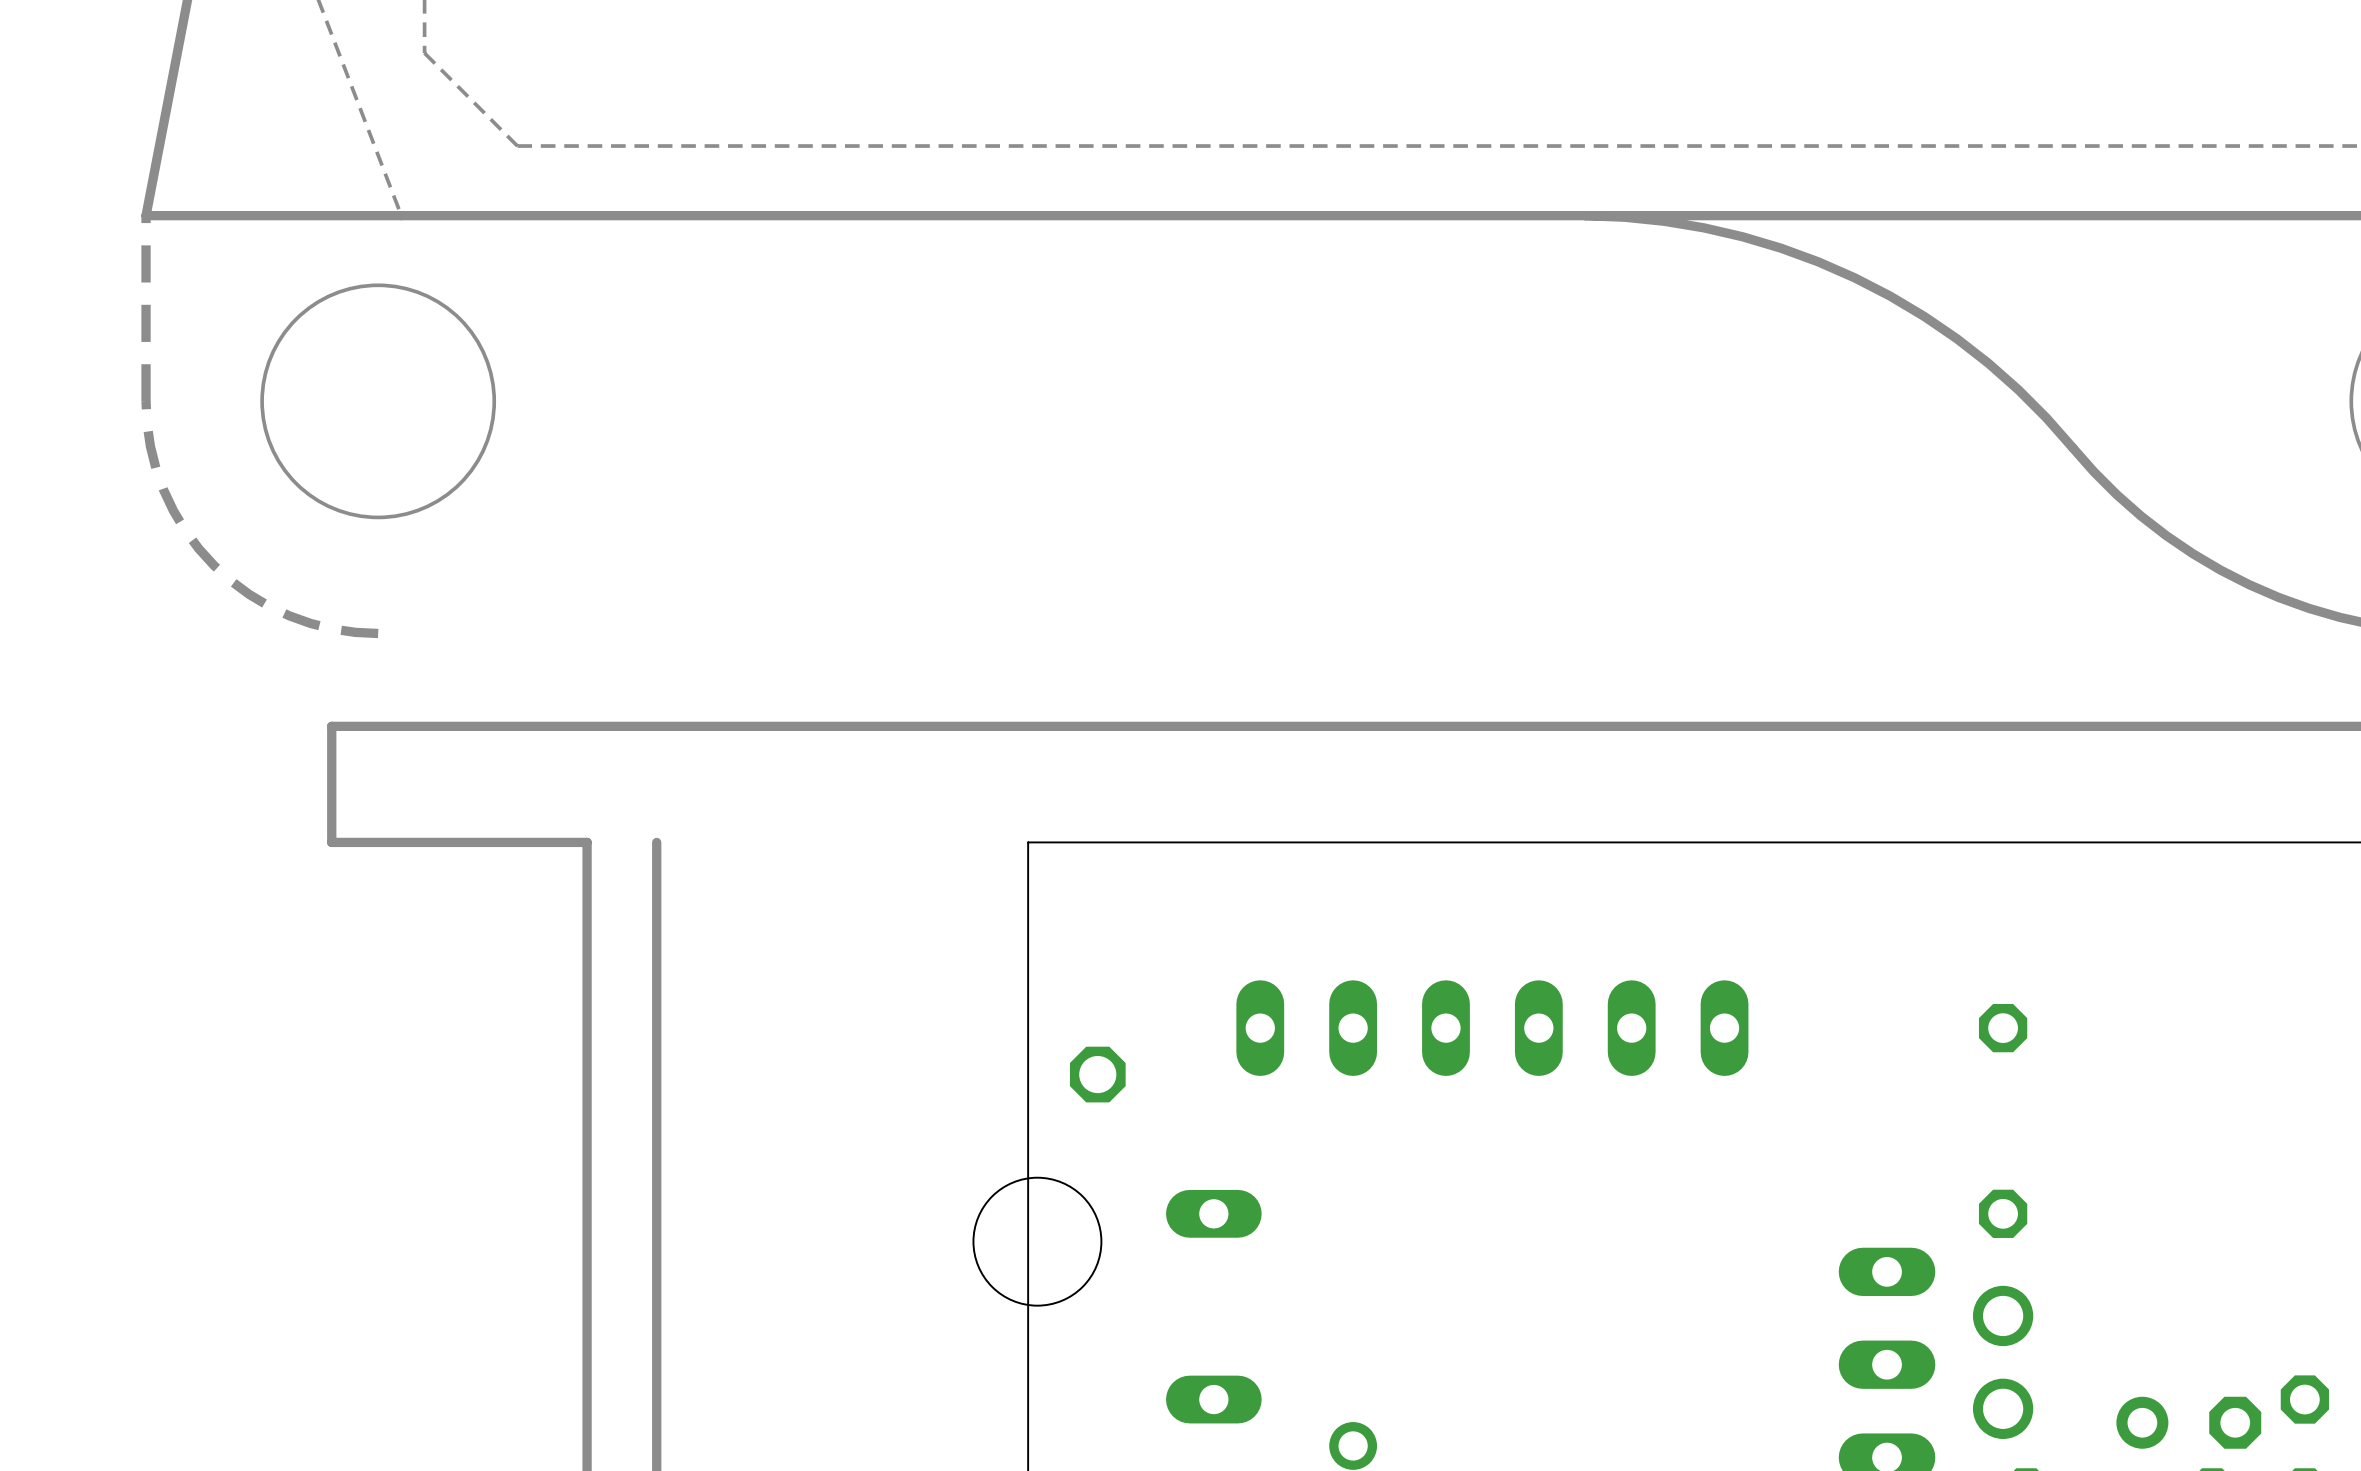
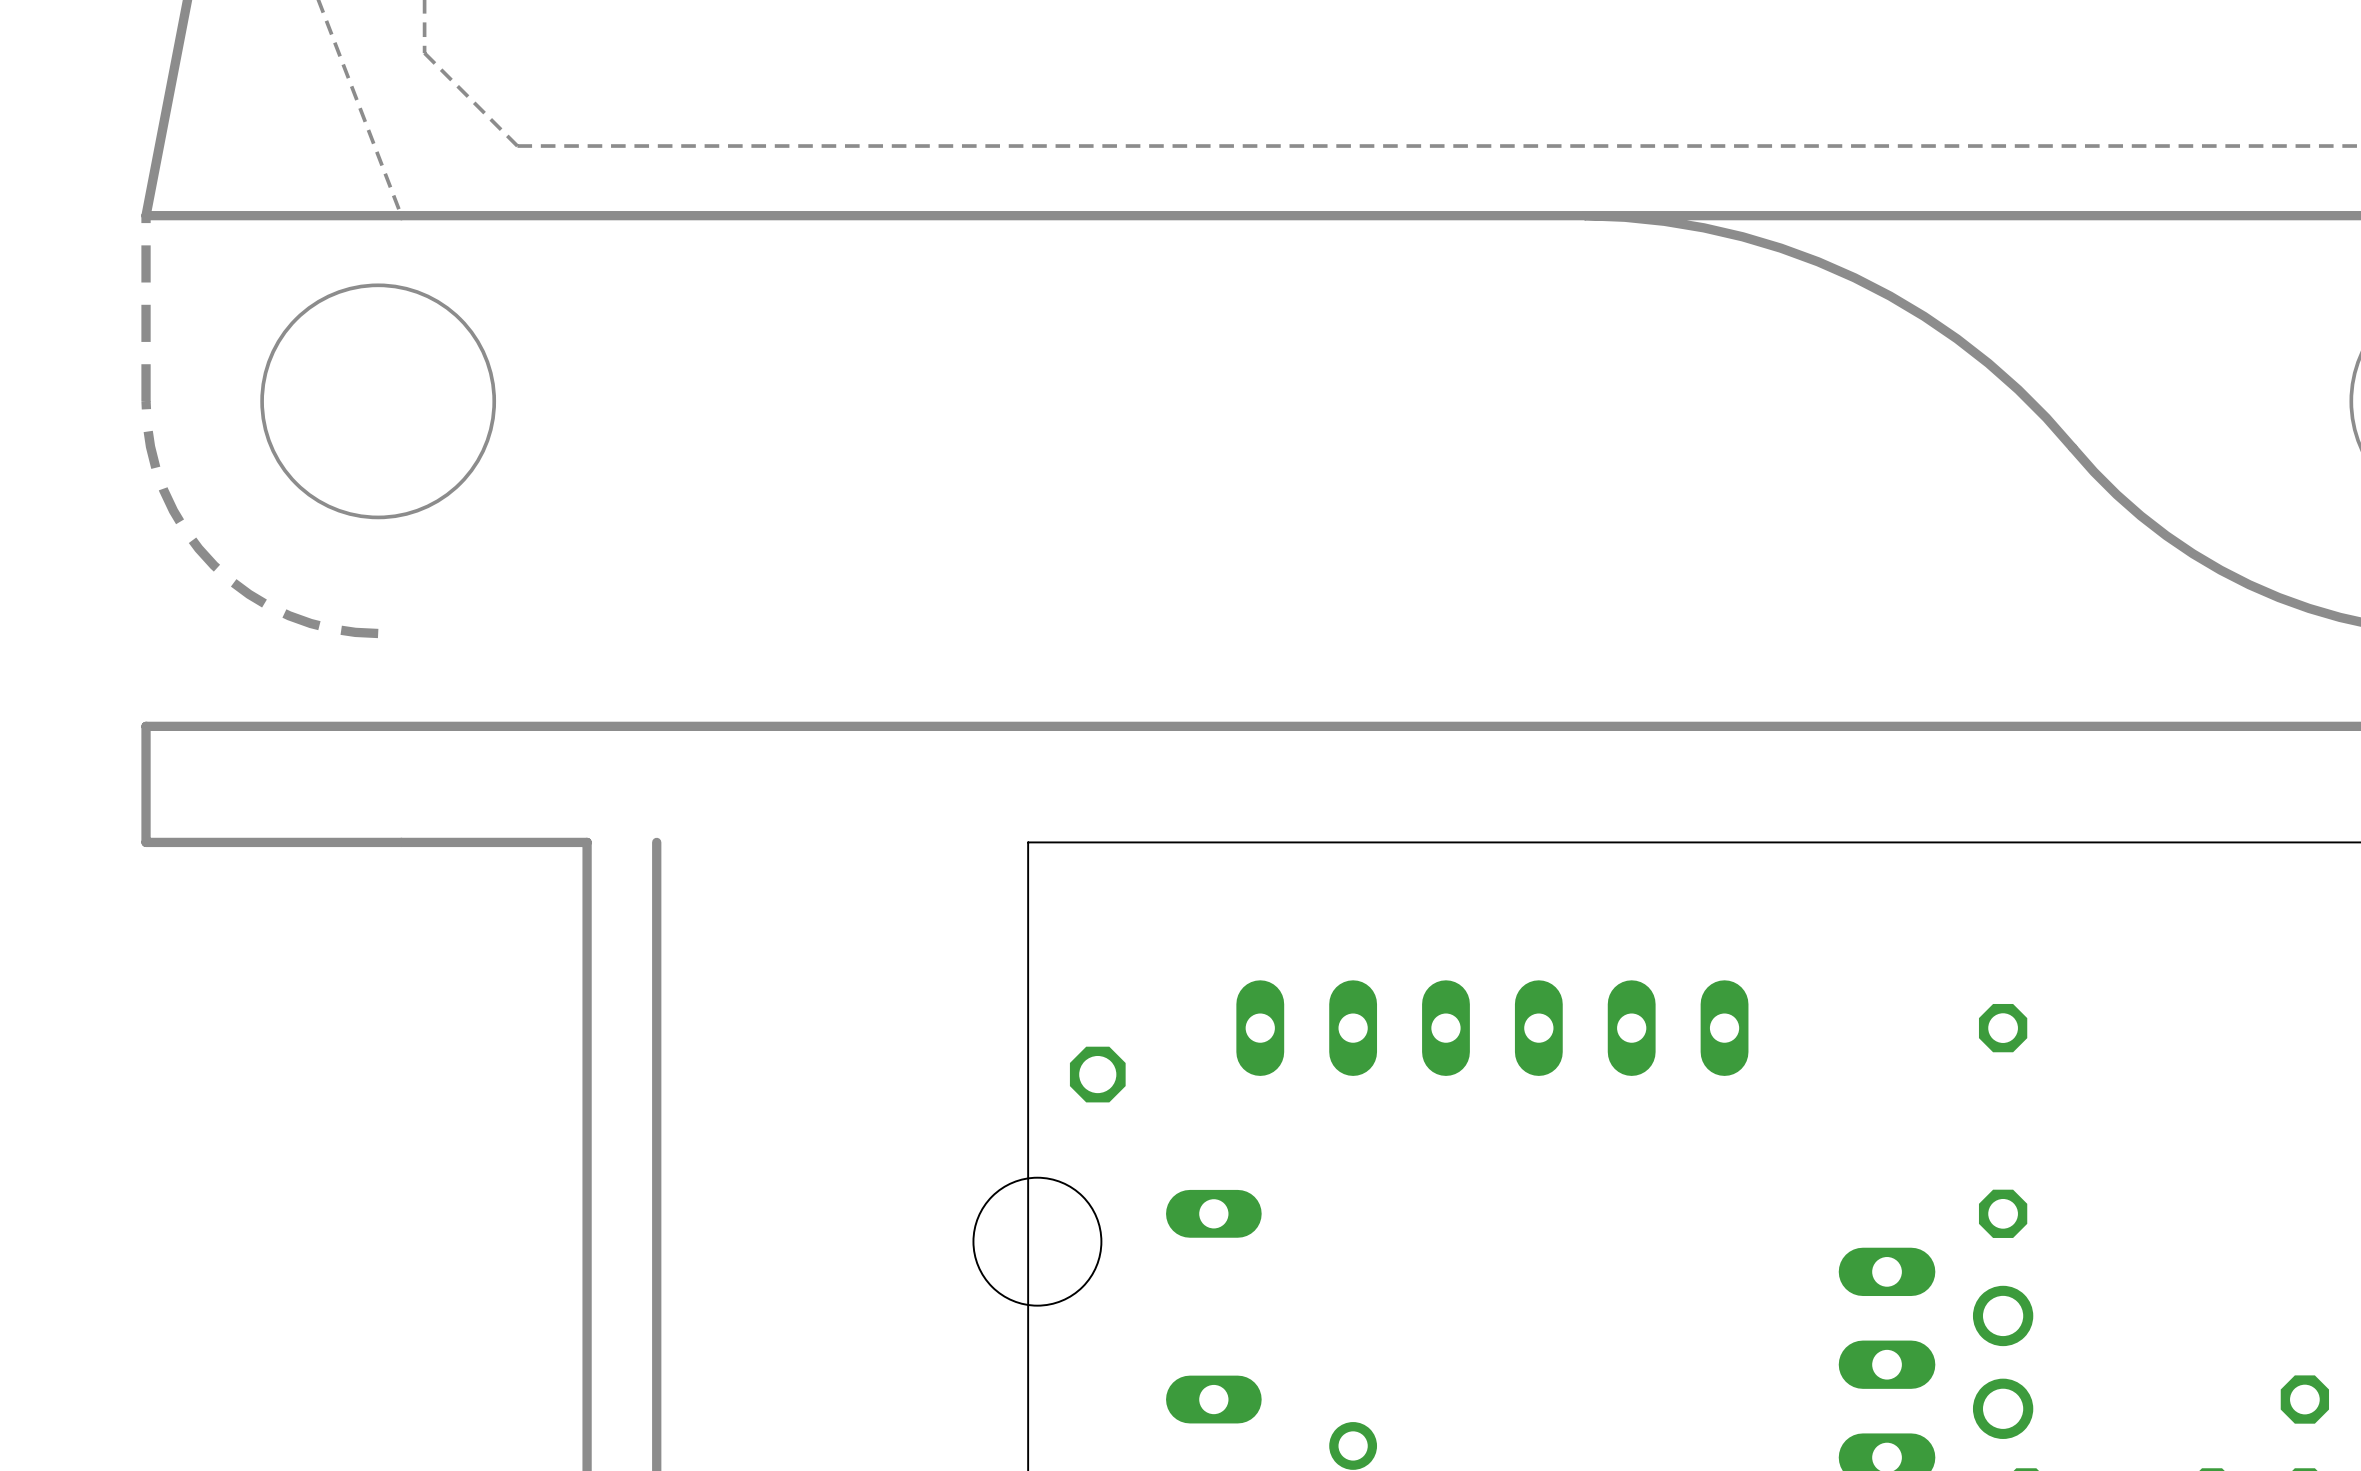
line: (331, 726) (331, 842) -> (331, 726) (146, 726) (146, 842) (331, 842)
part: (2188, 1422) -> none

